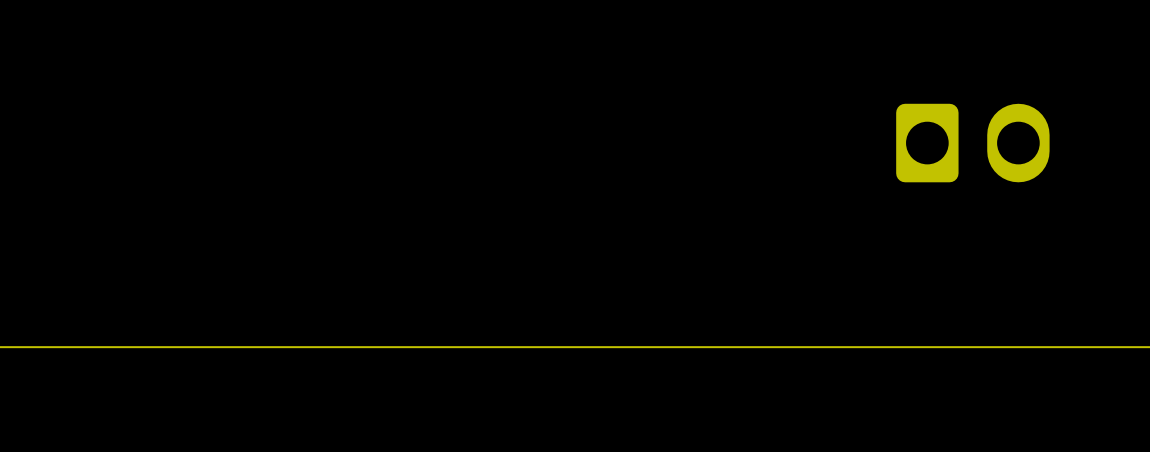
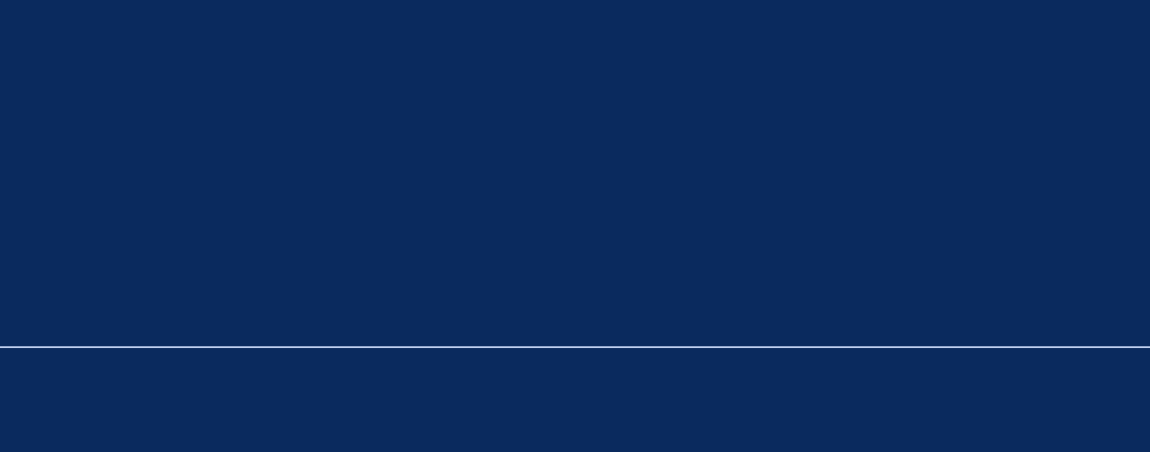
part: (972, 143) -> none

